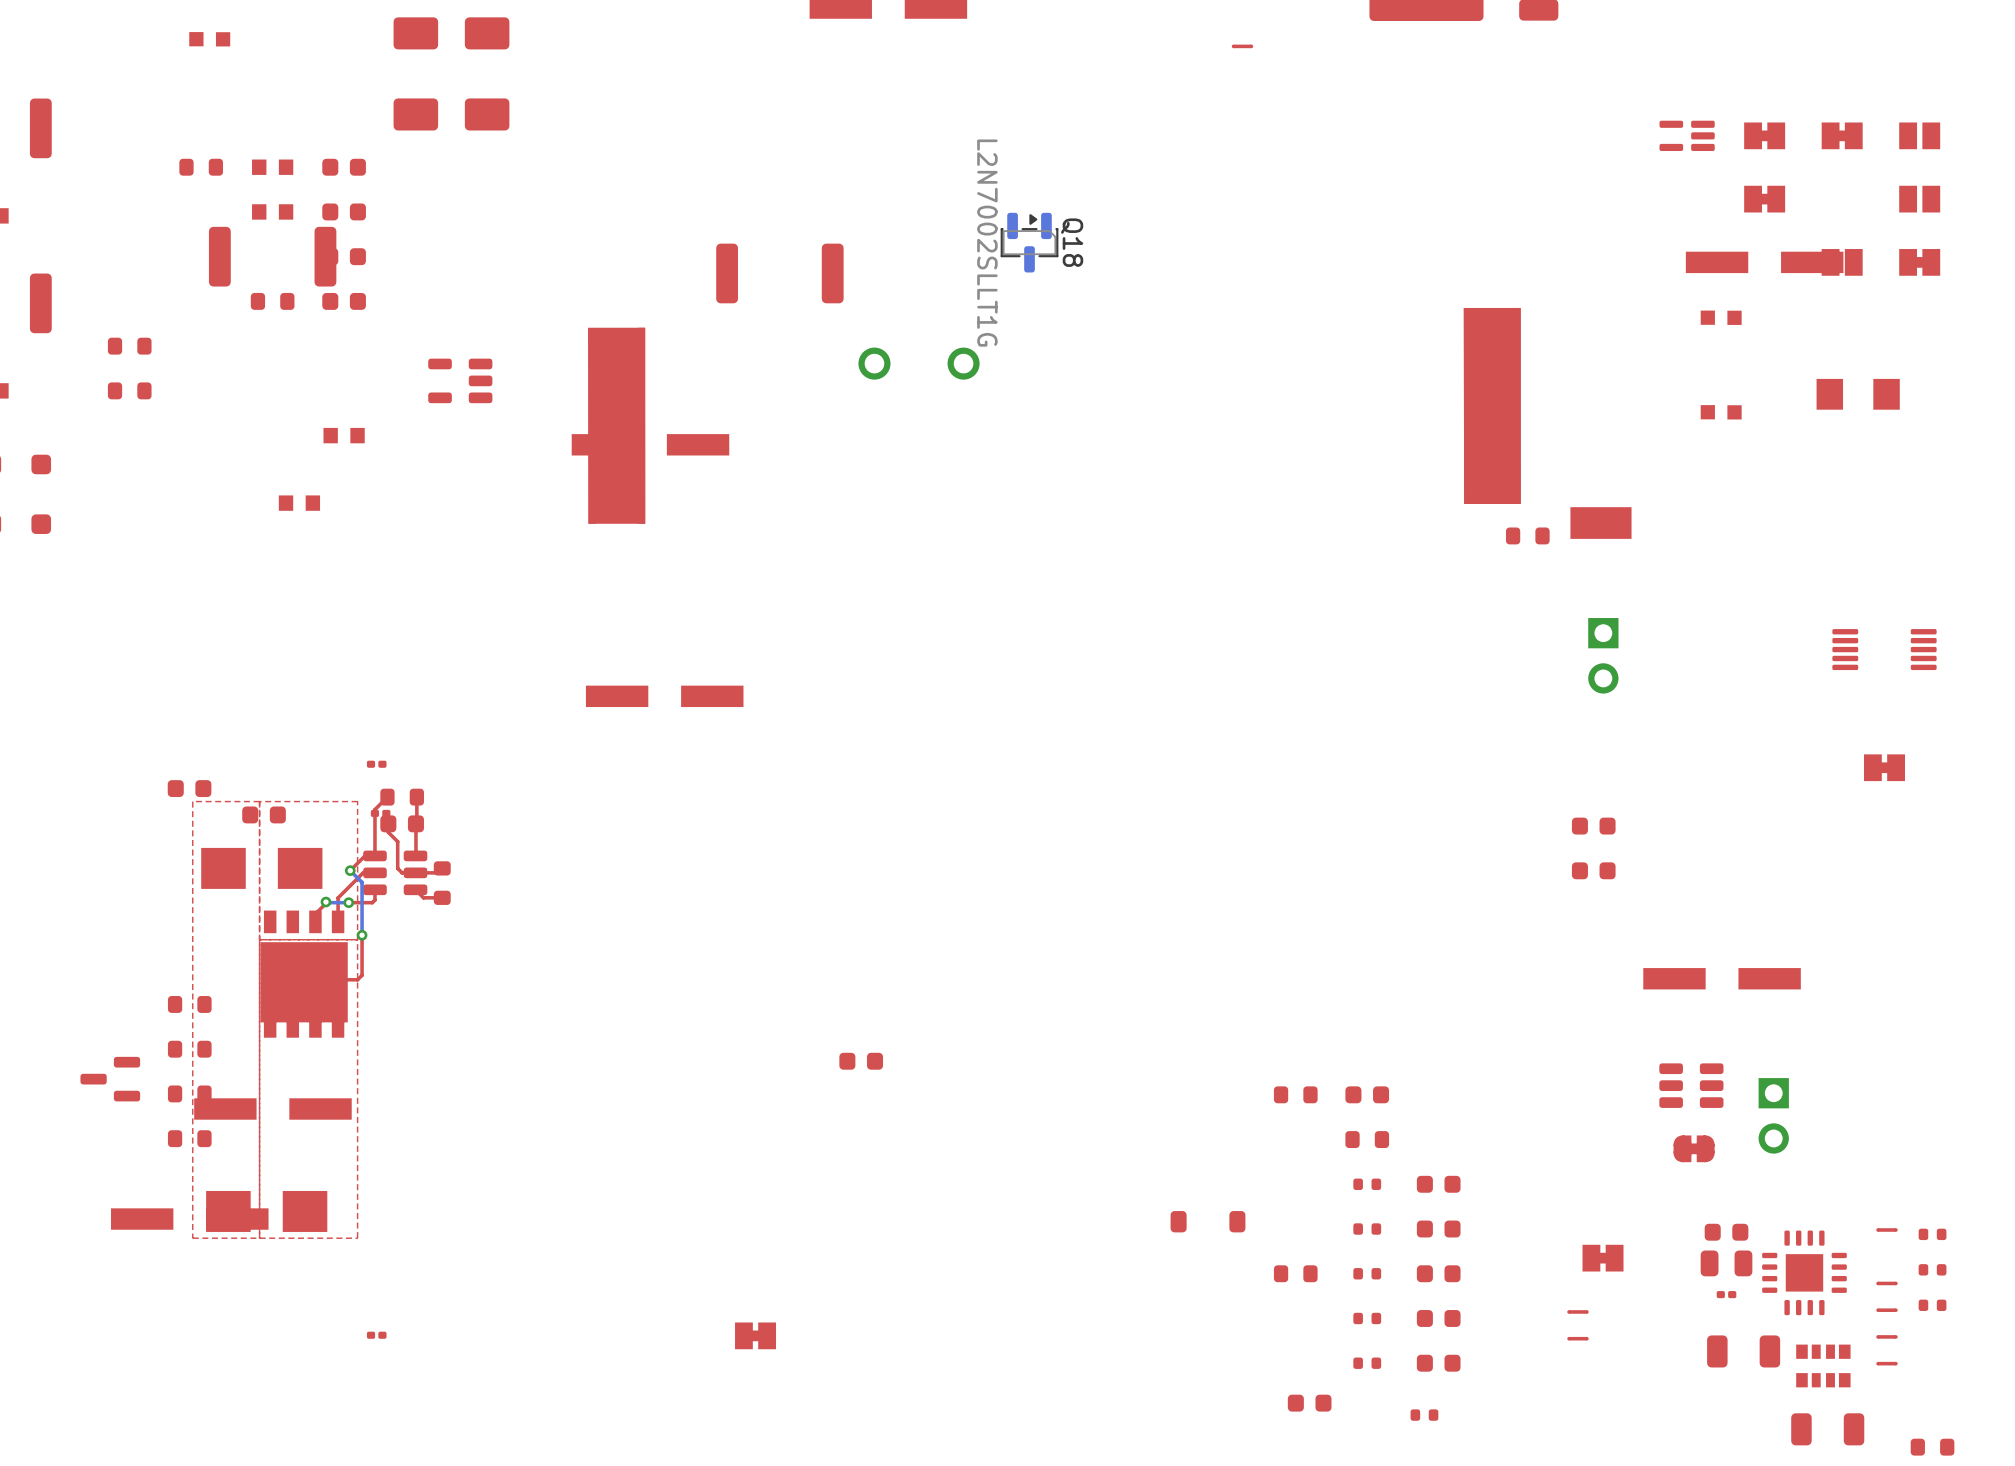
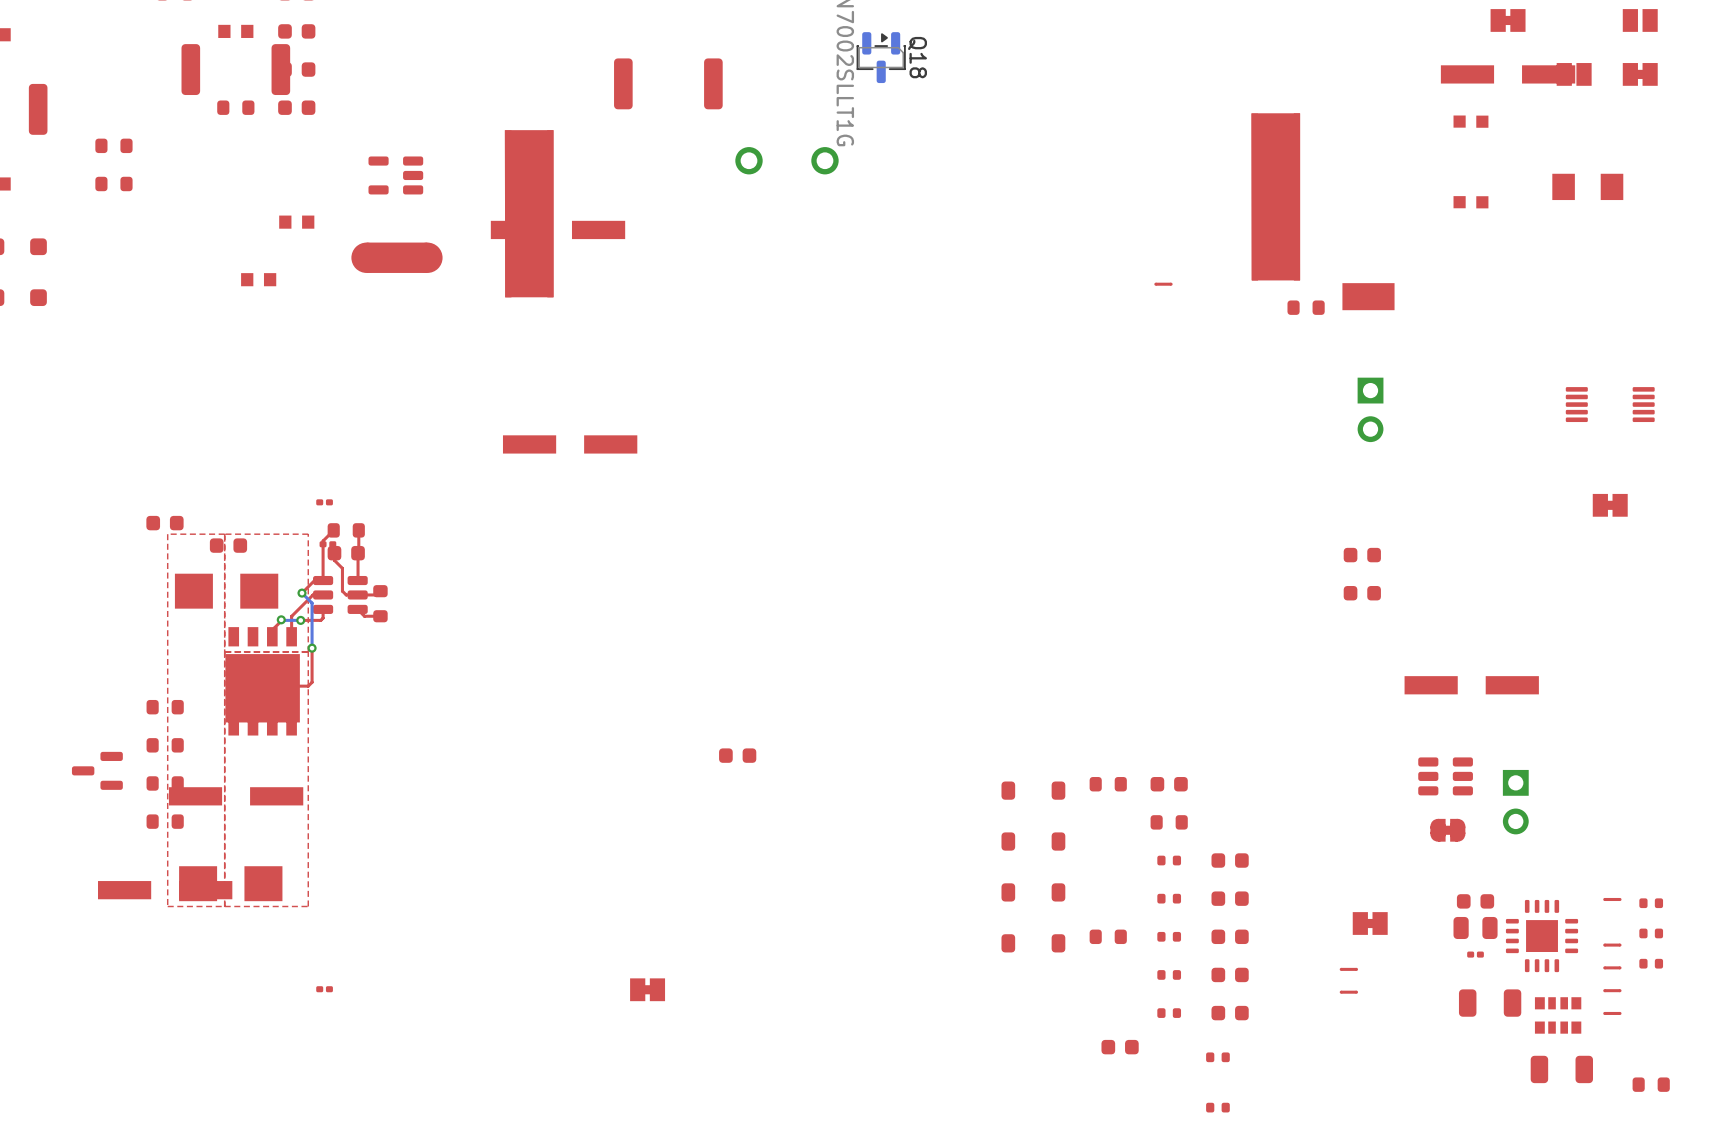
part: none -> (396, 257)
part: none -> (1163, 284)
part: none -> (1033, 790)
part: none -> (1033, 841)
part: none -> (1033, 943)

